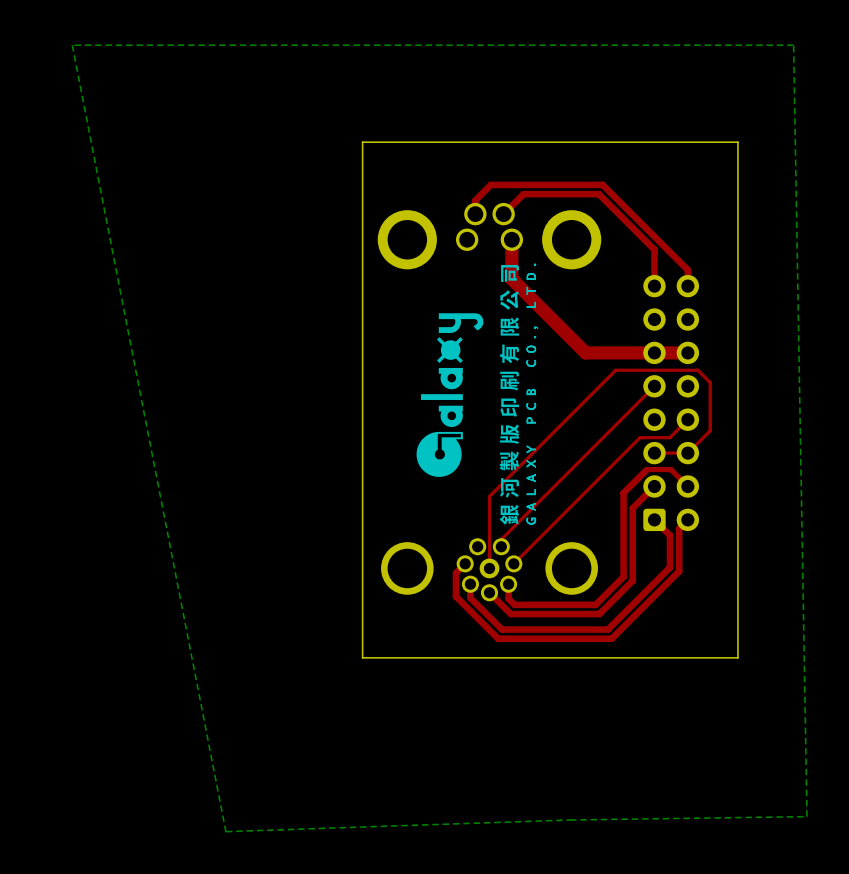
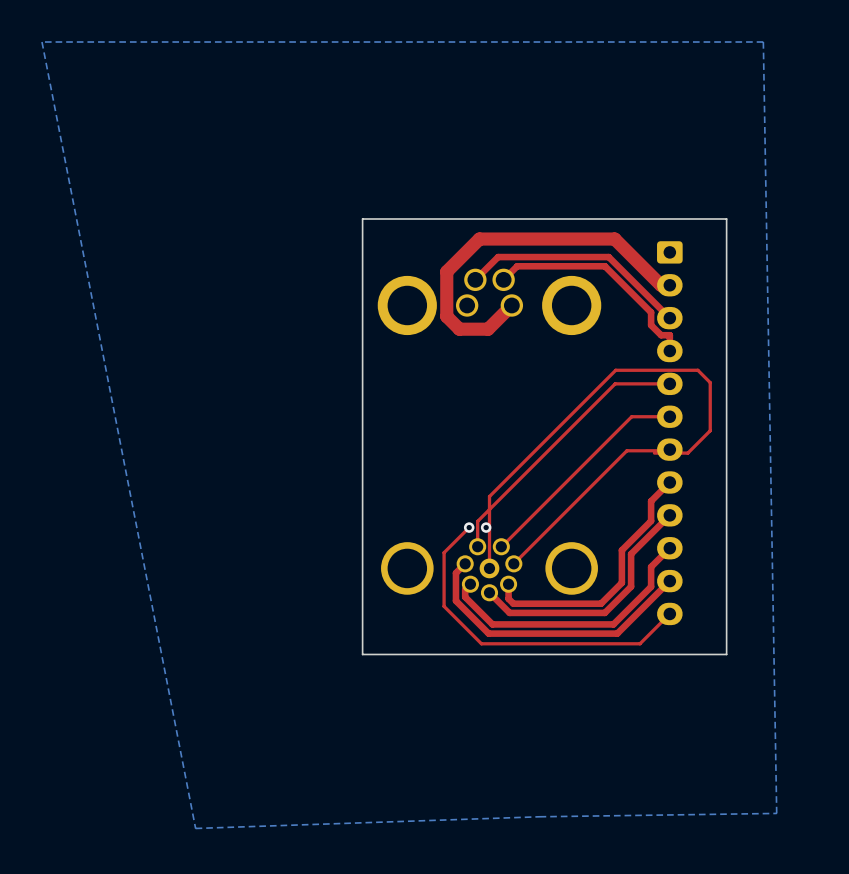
bottom zone outline: (72, 45) (225, 831) (569, 819) (806, 816) (793, 45) (72, 45) -> (42, 42) (195, 828) (539, 816) (776, 813) (763, 42) (42, 42)
top track: (475, 214) (475, 200) (490, 184) (602, 184) (687, 270) (687, 286) -> none
top track: (503, 214) (523, 194) (598, 194) (654, 249) (654, 286) -> none
board edge: (362, 218) (362, 142) (737, 142) (737, 657) (362, 657) (362, 654) -> (362, 218) (726, 218) (726, 654) (362, 654)
part position: (489, 236) -> (489, 301)
top track: (511, 239) (511, 279) (585, 352) (687, 352) -> none
drawing: [499, 263, 539, 525] -> none
top track: none -> (475, 279) (498, 257) (608, 257) (669, 318)
top track: none -> (503, 279) (517, 266) (604, 266) (651, 312) (651, 325) (661, 335) (669, 335) (669, 351)
top track: none -> (669, 285) (660, 285) (614, 239) (479, 239) (446, 271) (446, 316) (459, 329) (488, 329) (511, 305)
drawing: [416, 313, 484, 477] -> none
top track: none -> (669, 383) (615, 383) (477, 521) (477, 546)
top track: (654, 386) (501, 539) (501, 546) -> (669, 416) (631, 416) (501, 546)
part: (671, 403) -> none
top track: (687, 419) (669, 437) (640, 437) (626, 450) -> (669, 449) (626, 450)
part: none -> (669, 433)
top track: (654, 486) (632, 508) (632, 580) (599, 614) (509, 612) -> (669, 515) (631, 554) (631, 586) (604, 612) (509, 612)
top track: (687, 486) (670, 469) (647, 469) (623, 493) (623, 576) (595, 604) (513, 603) -> (669, 482) (651, 501) (651, 521) (621, 550) (621, 582) (601, 603) (513, 603)
top track: (654, 519) (669, 535) (669, 567) (607, 629) (502, 629) (470, 598) (470, 584) -> (669, 548) (651, 566) (651, 586) (613, 624) (492, 624) (465, 597) (465, 589) (470, 584)
top track: (687, 519) (679, 528) (679, 571) (611, 638) (498, 638) (455, 596) -> (669, 581) (617, 633) (488, 633) (455, 600) (455, 596)
top track: none -> (469, 527) (444, 552) (444, 606) (481, 643) (640, 643) (669, 613)
via: none -> (469, 527)
via: none -> (486, 527)

